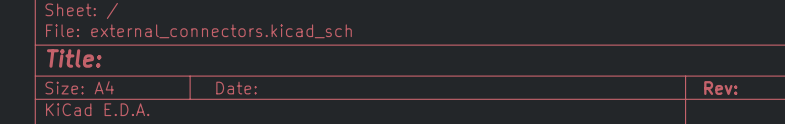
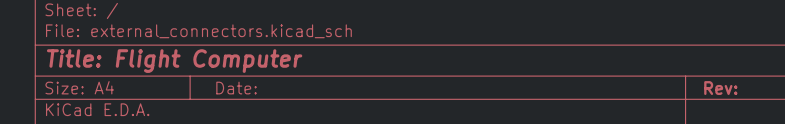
title block: Title: (74, 58) -> Title: Flight Computer (174, 61)

